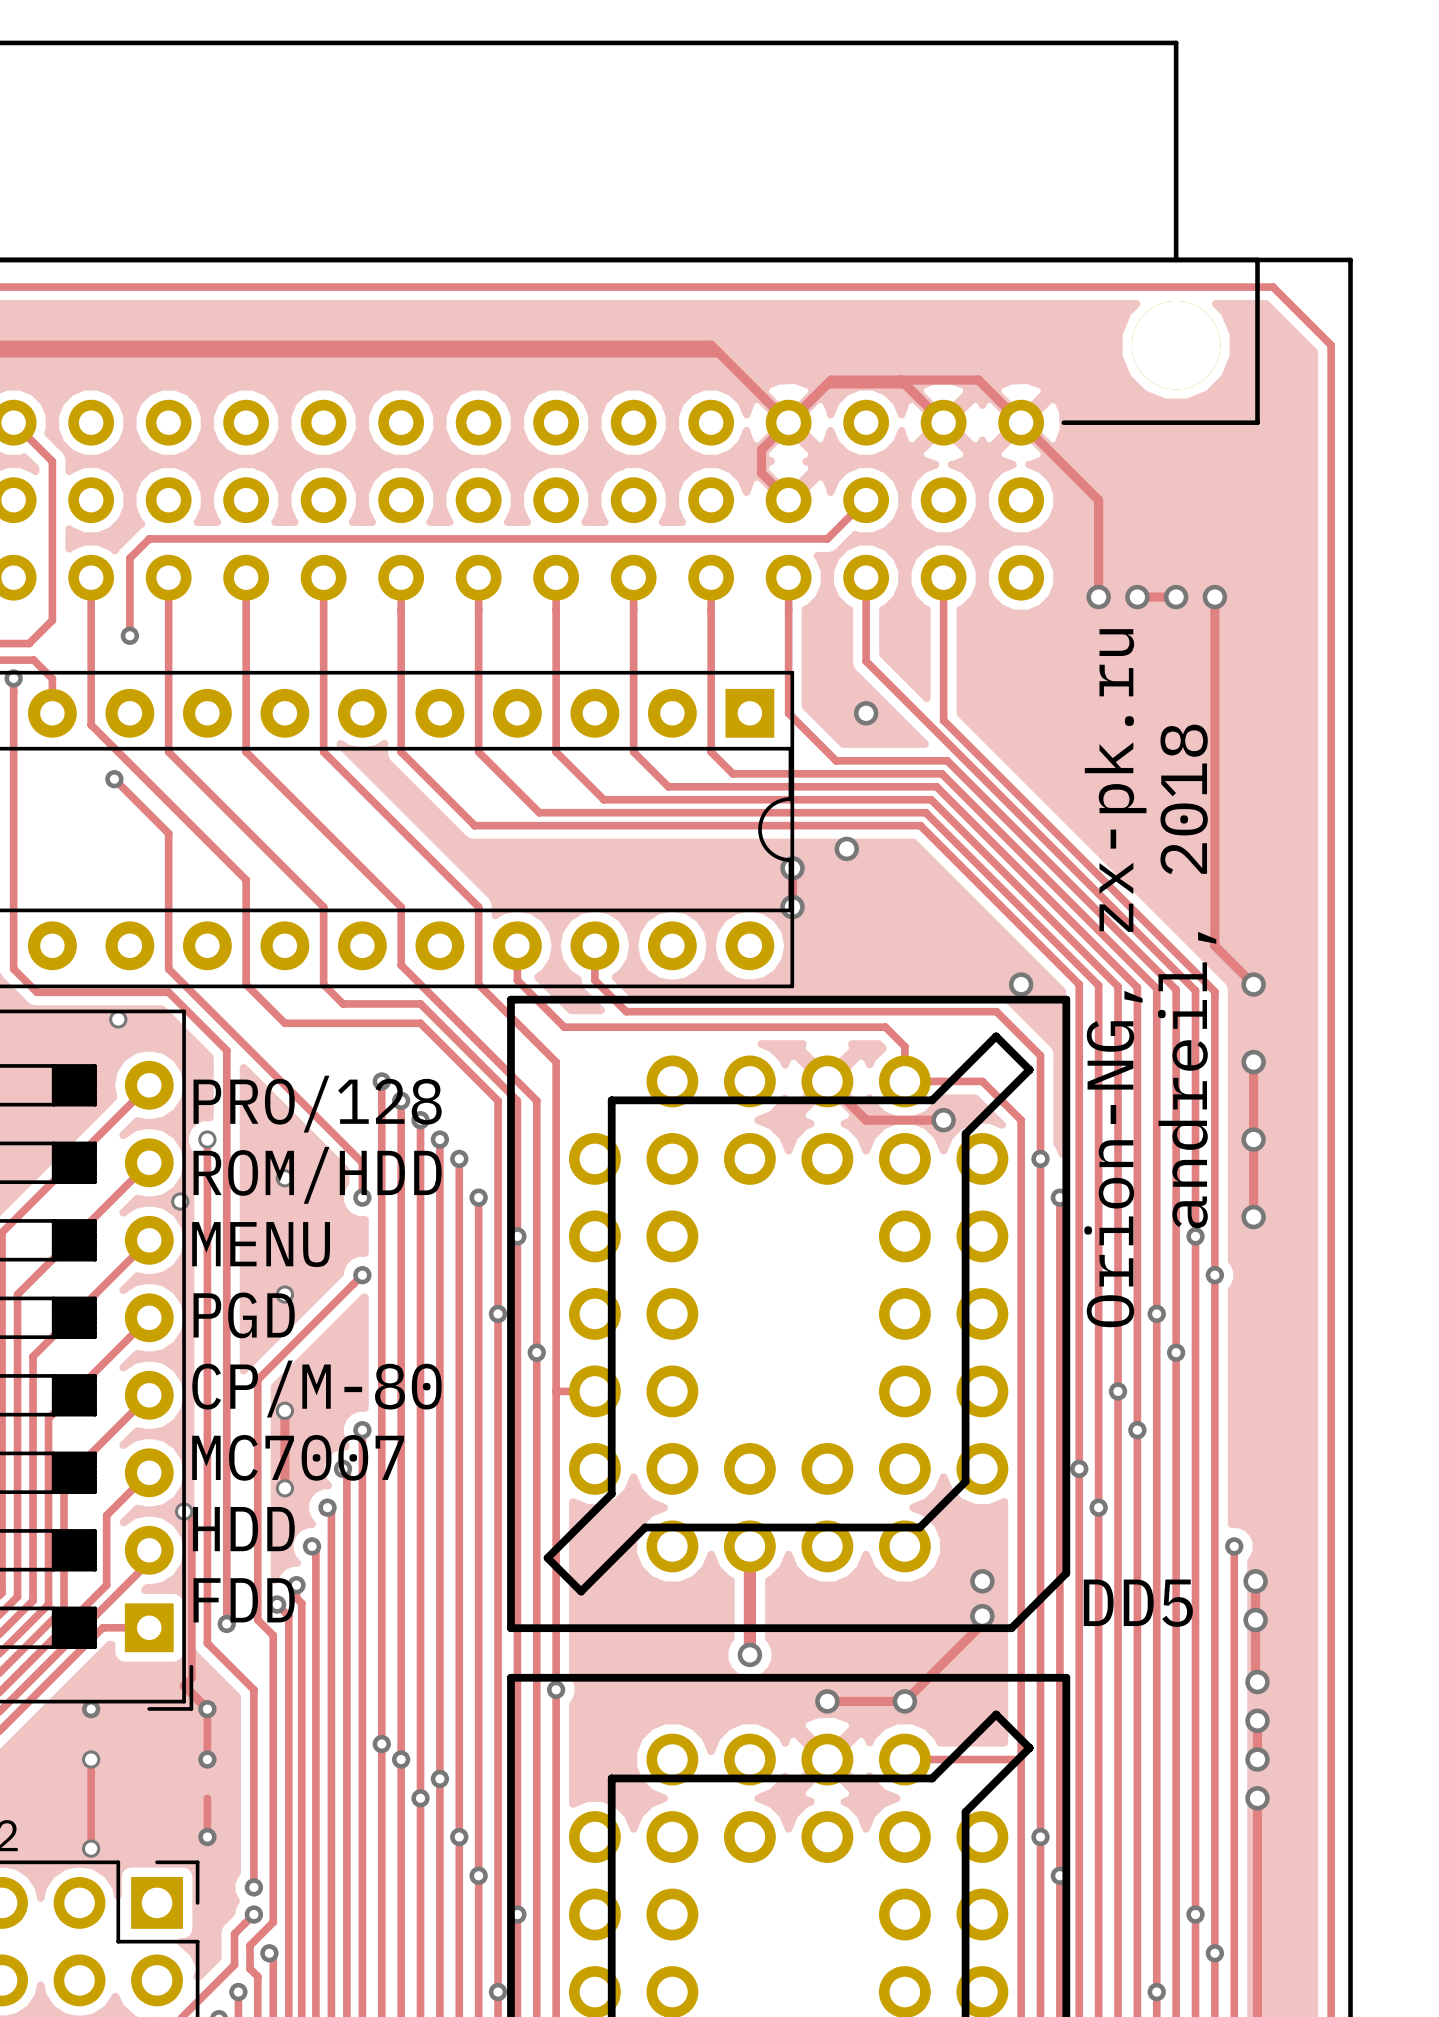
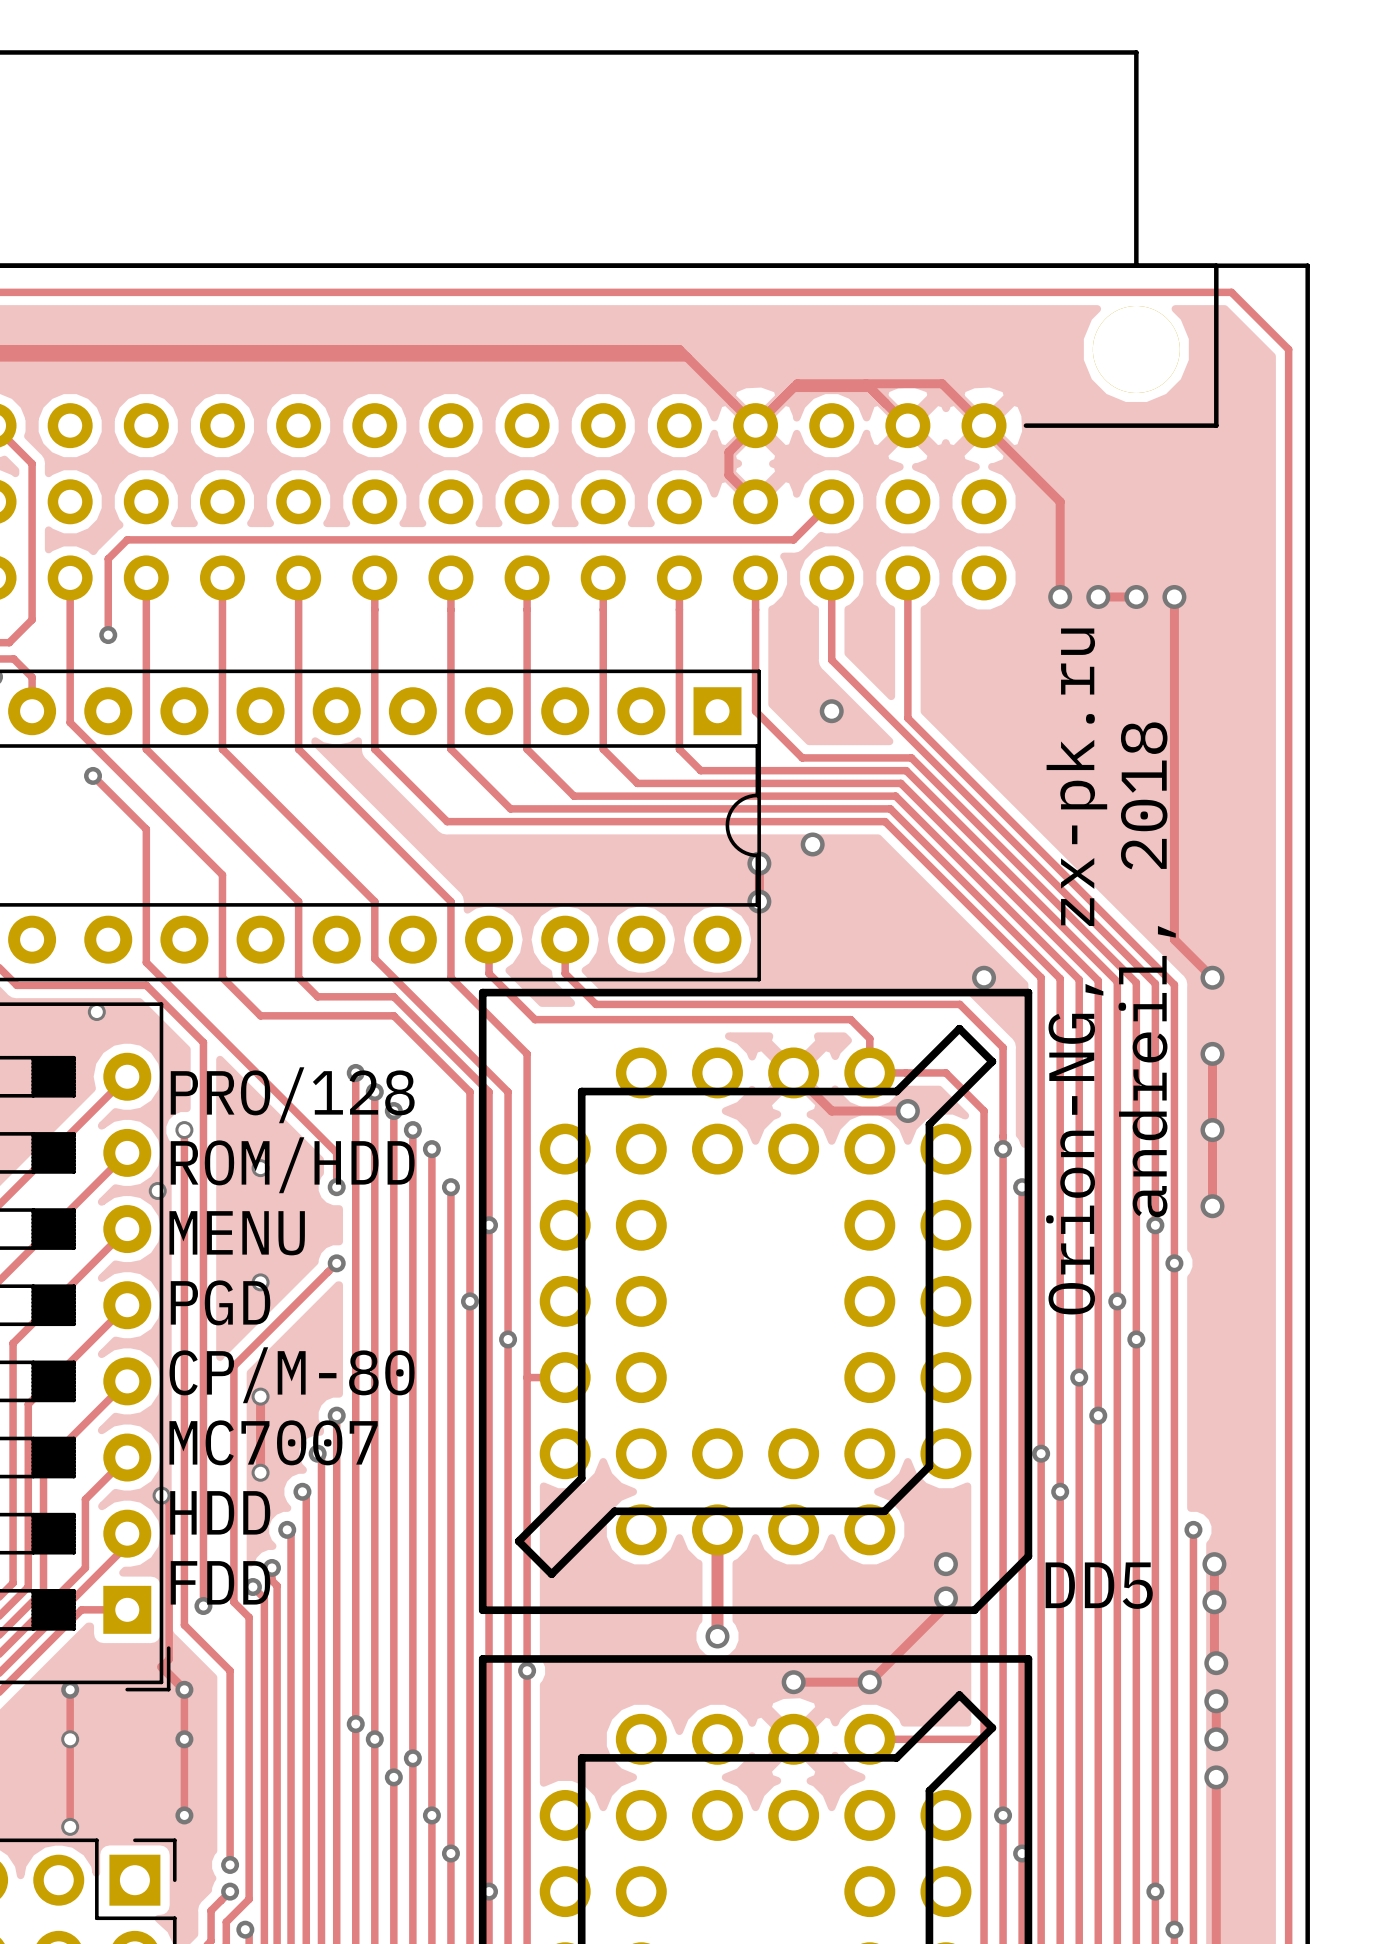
track: none -> (70, 1689) (70, 1739)
track: none -> (184, 1739) (184, 1777)

